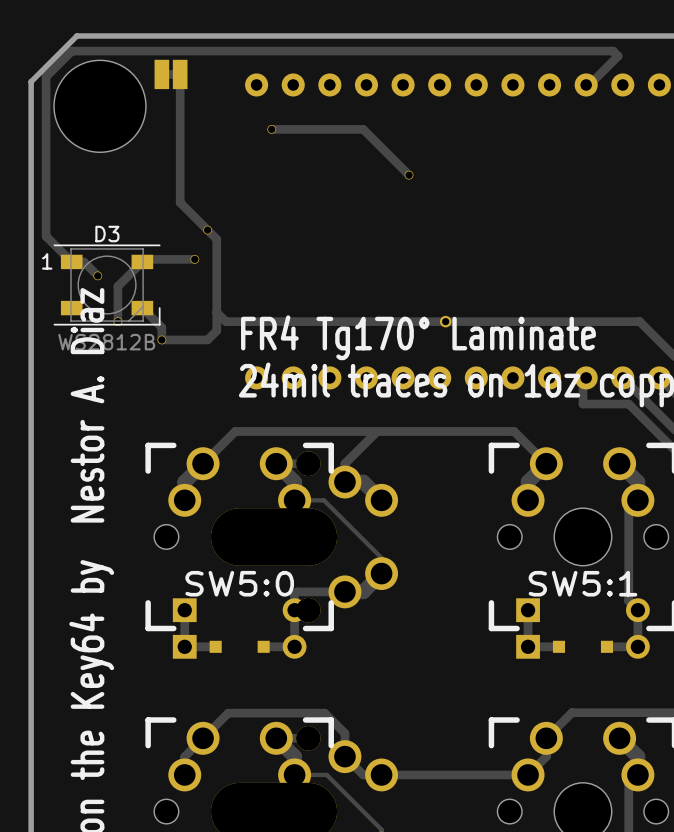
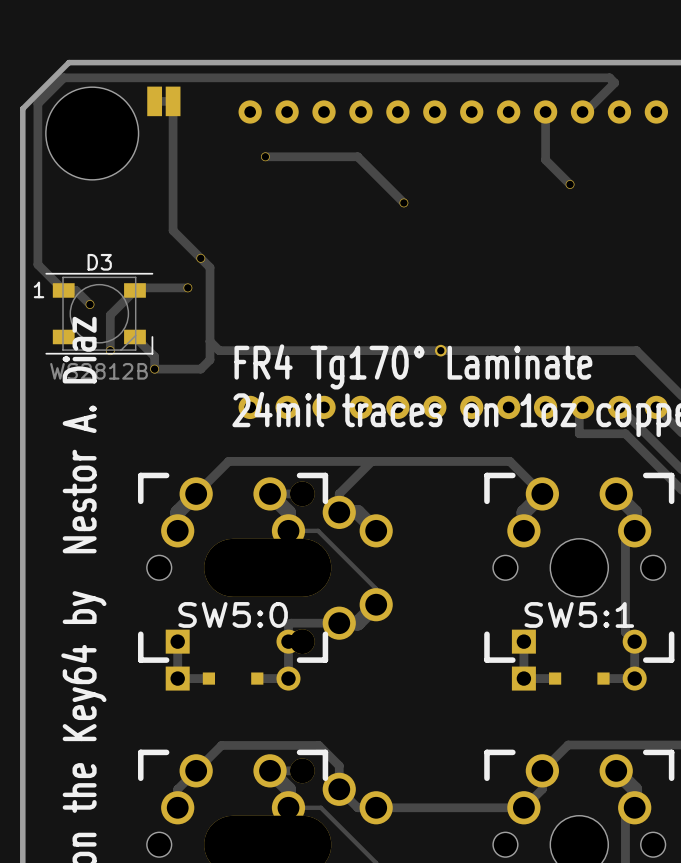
track: none -> (545, 111) (545, 159) (570, 184)
via: none -> (570, 184)

